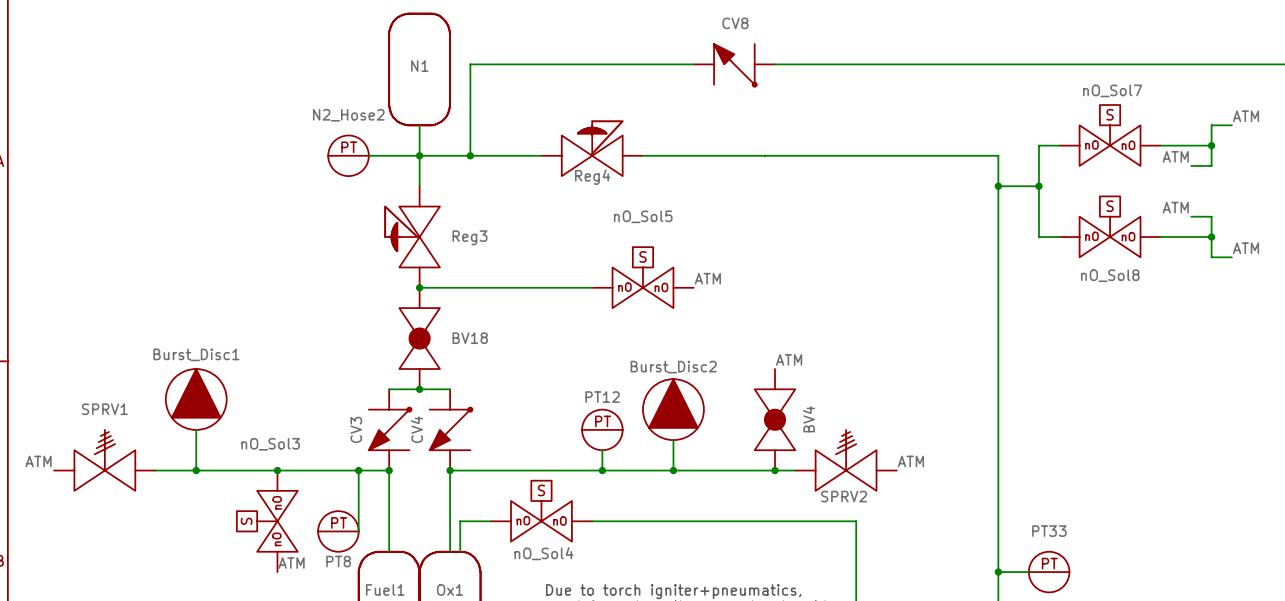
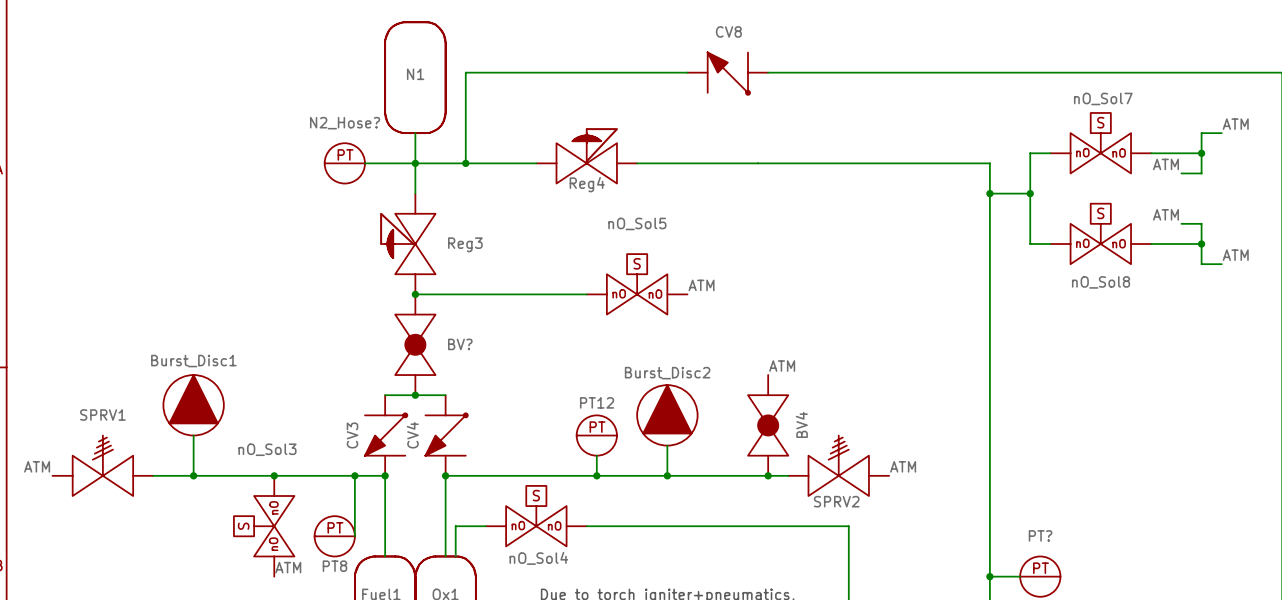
N2_Hose2 name: N2_Hose2 (348, 115) -> N2_Hose? (345, 123)
BV18 name: BV18 (470, 338) -> BV? (460, 344)
PT33 name: PT33 (1049, 531) -> PT? (1040, 535)

